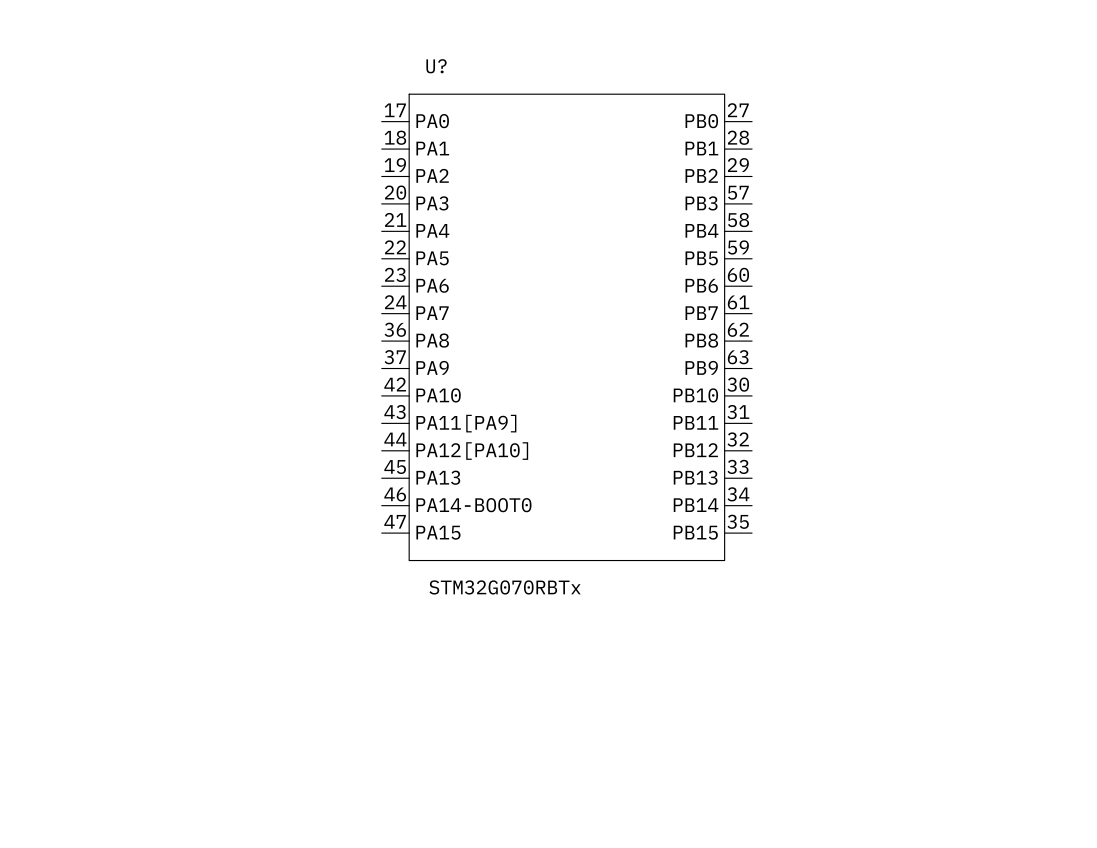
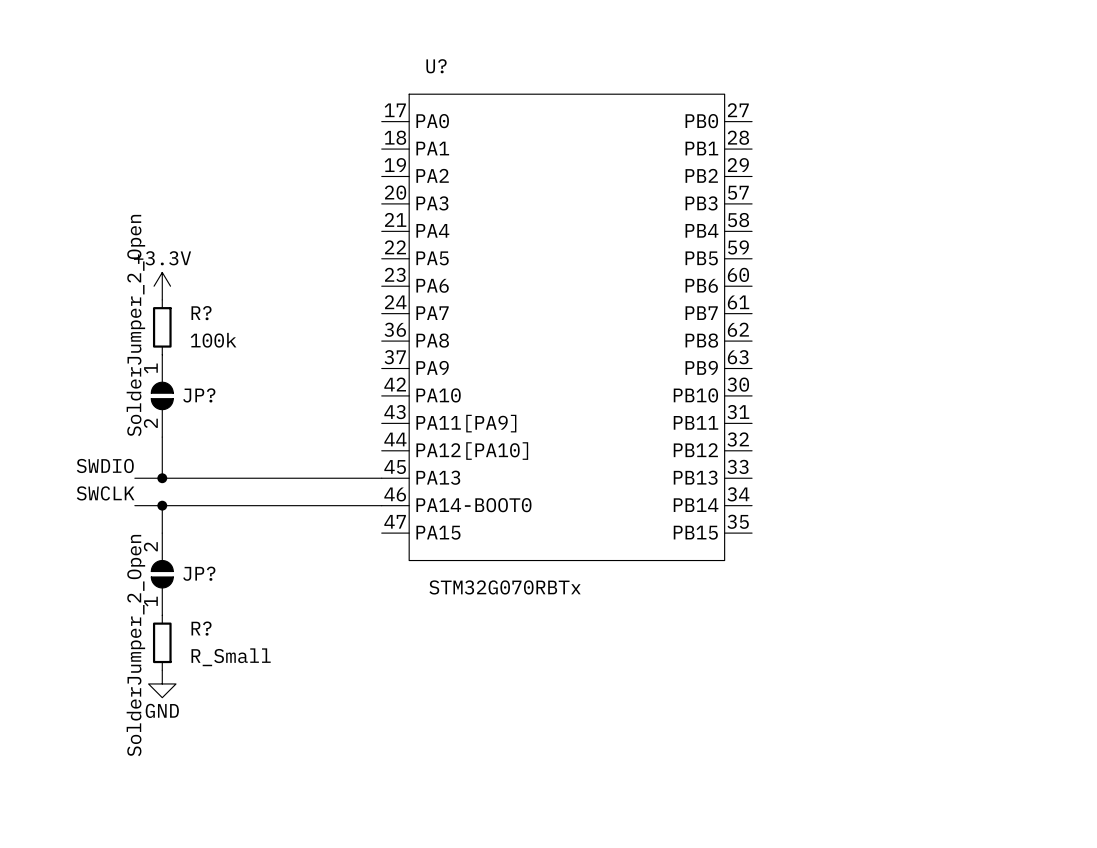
power symbol: none -> +3.3V (162, 286)
R?: none -> 100k (162, 327)
JP?: none -> SolderJumper_2_Open (162, 395)
wire: none -> (162, 437) (162, 478)
label: none -> SWDIO (105, 465)
wire: none -> (134, 478) (381, 478)
junction: none -> (162, 478)
label: none -> SWCLK (105, 493)
wire: none -> (134, 505) (381, 505)
wire: none -> (162, 505) (162, 533)
junction: none -> (162, 505)
JP?: none -> SolderJumper_2_Open (162, 574)
R?: none -> R_Small (162, 642)
power symbol: none -> GND (162, 683)

